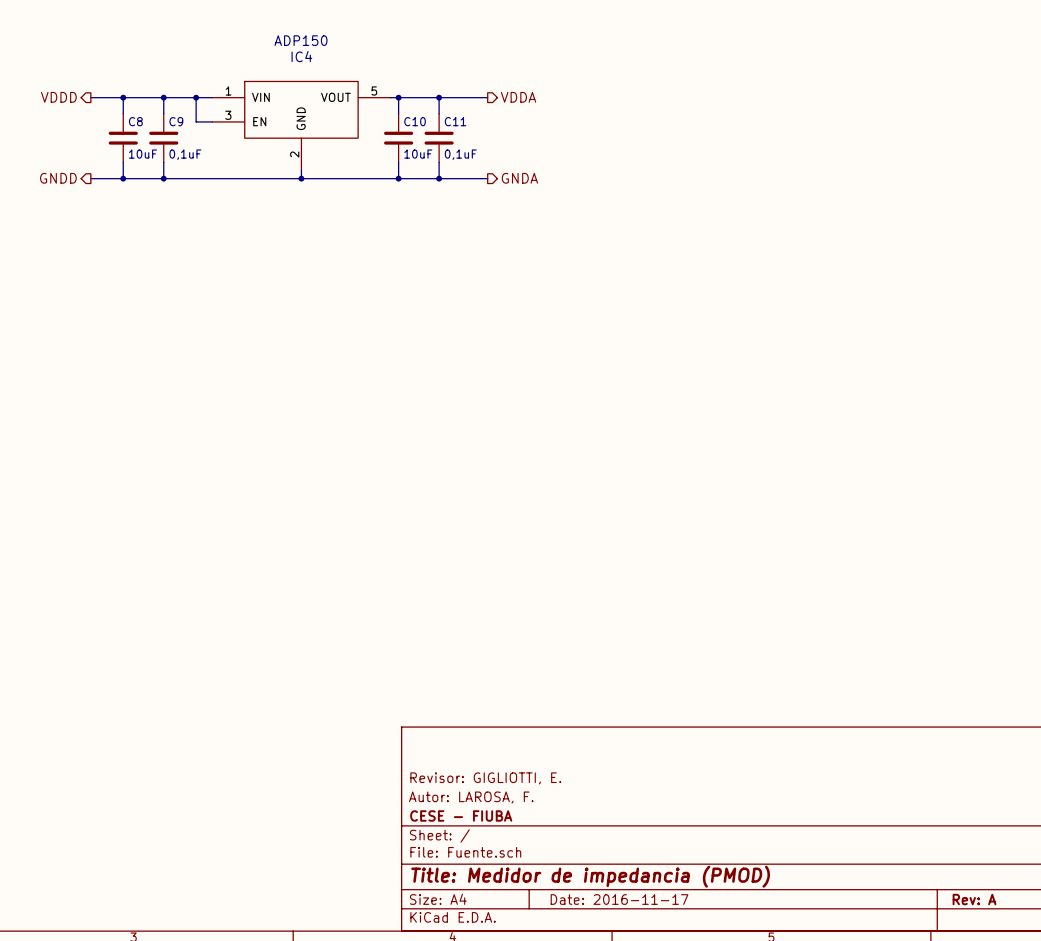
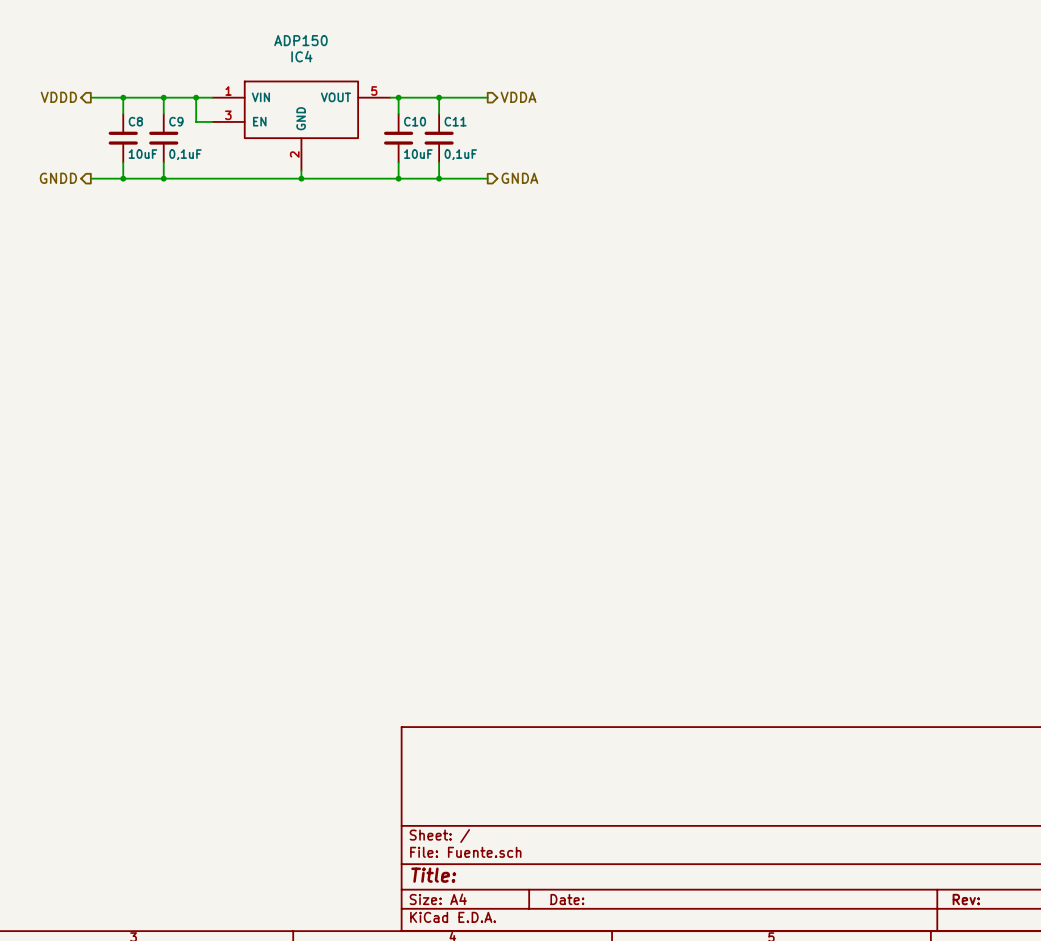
title block: Revisor: GIGLIOTTI, E. (485, 778) -> none
title block: Autor: LAROSA, F. (471, 797) -> none
title block: CESE - FIUBA (461, 815) -> none
title block: Title: Medidor de impedancia (PMOD) (590, 876) -> Title: (433, 875)
title block: Date: 2016-11-17 (619, 899) -> Date: (567, 899)
title block: Rev: A (974, 899) -> Rev: (966, 899)

